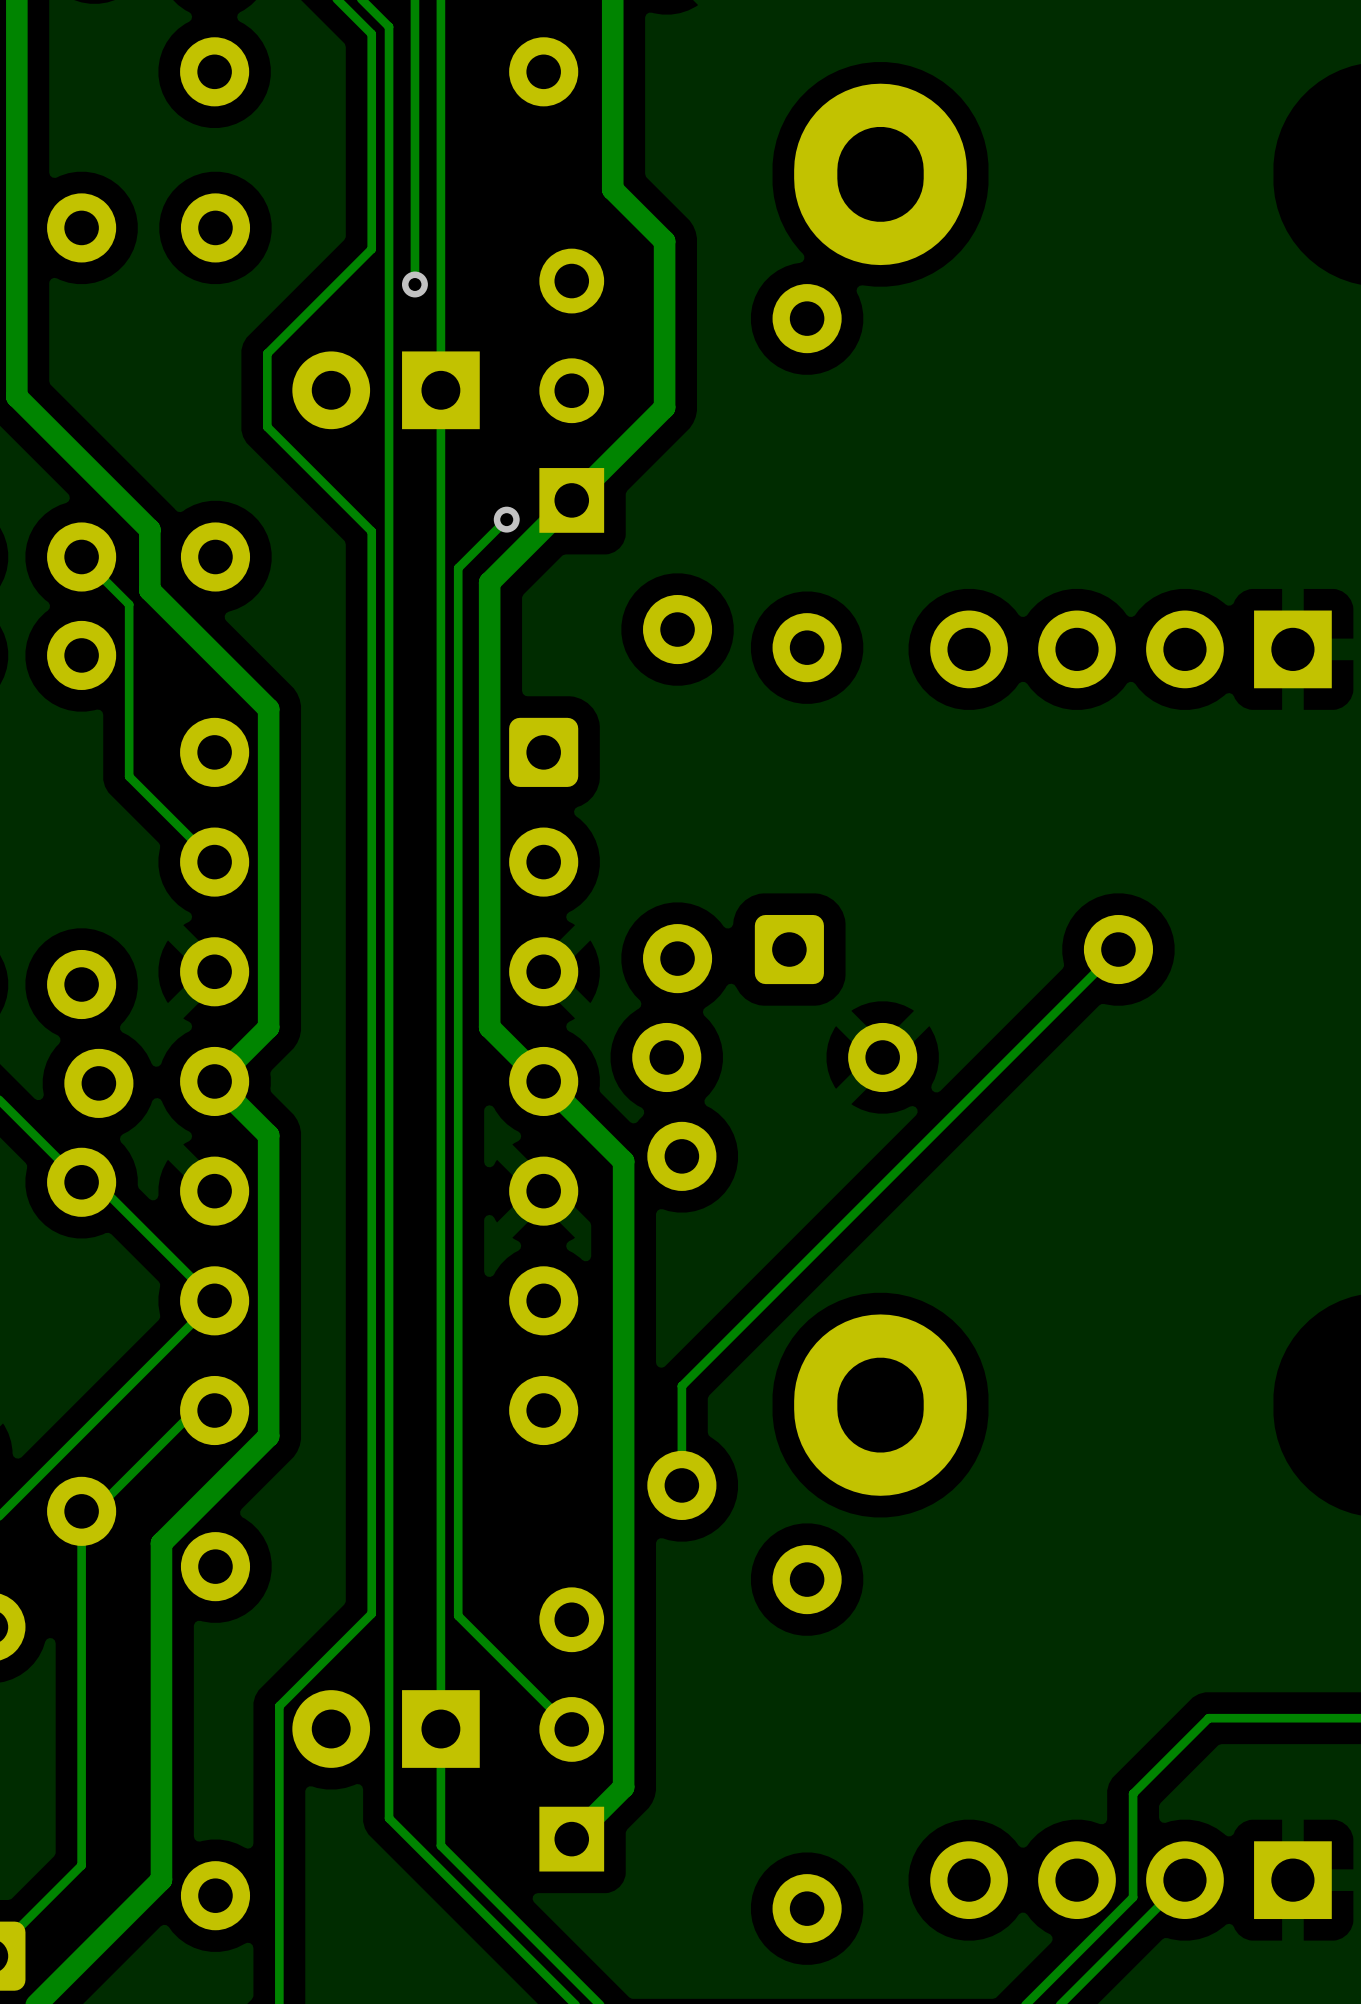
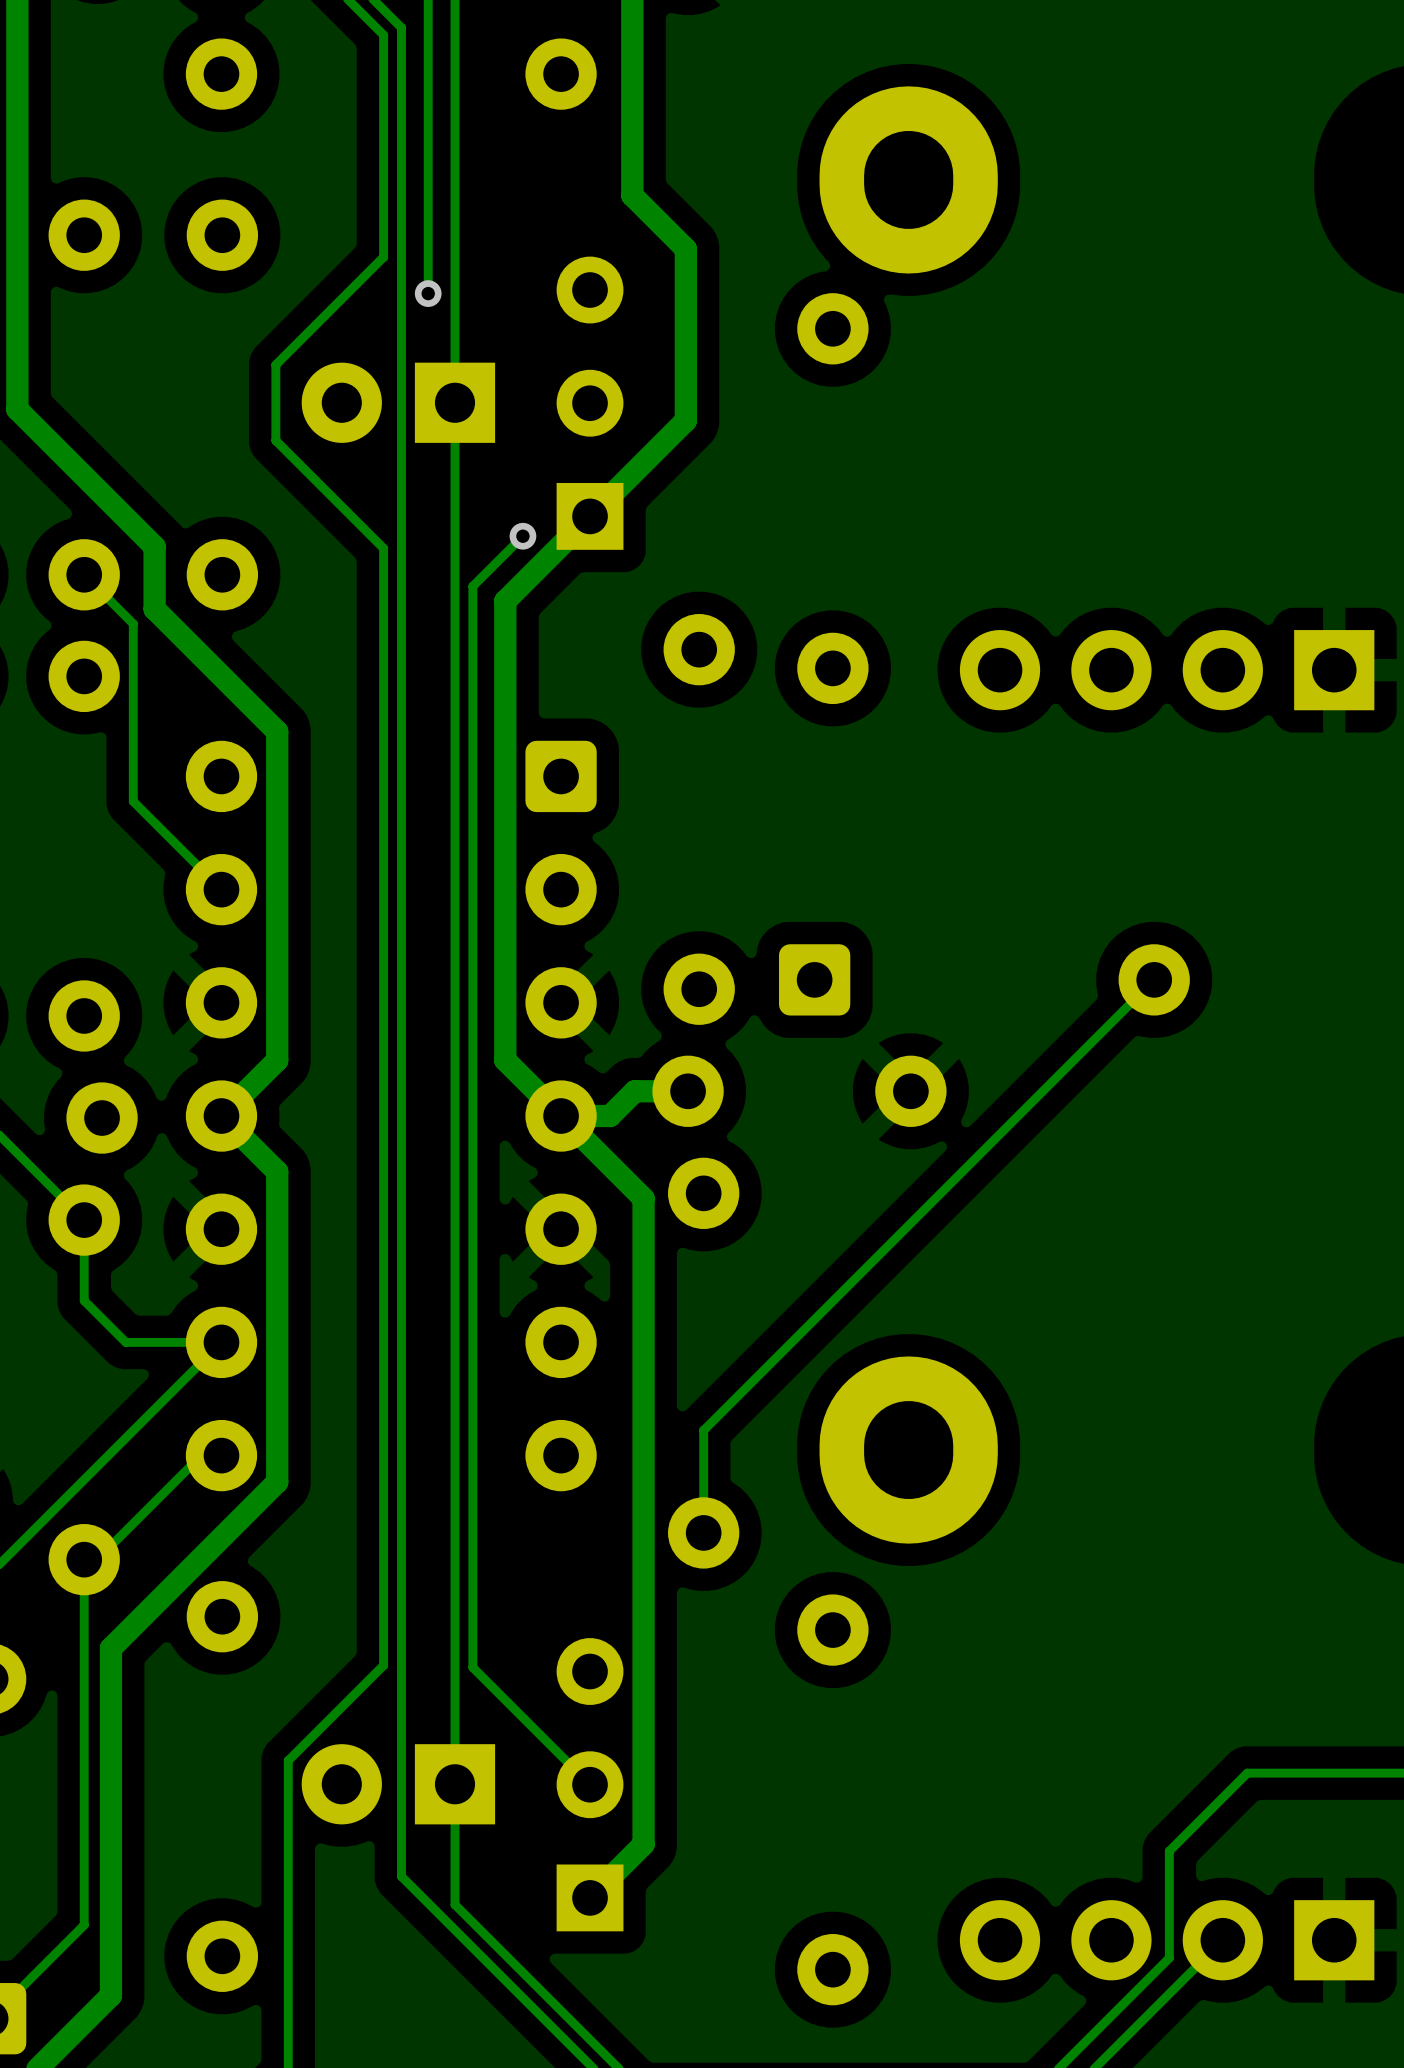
track: none -> (688, 1091) (634, 1091) (610, 1116) (561, 1116)
track: (81, 1182) (96, 1182) (214, 1300) -> (84, 1220) (84, 1300) (125, 1342) (221, 1342)
track: (161, 1543) (161, 1879) (107, 1933) -> (166, 1592) (110, 1648) (110, 1995)

